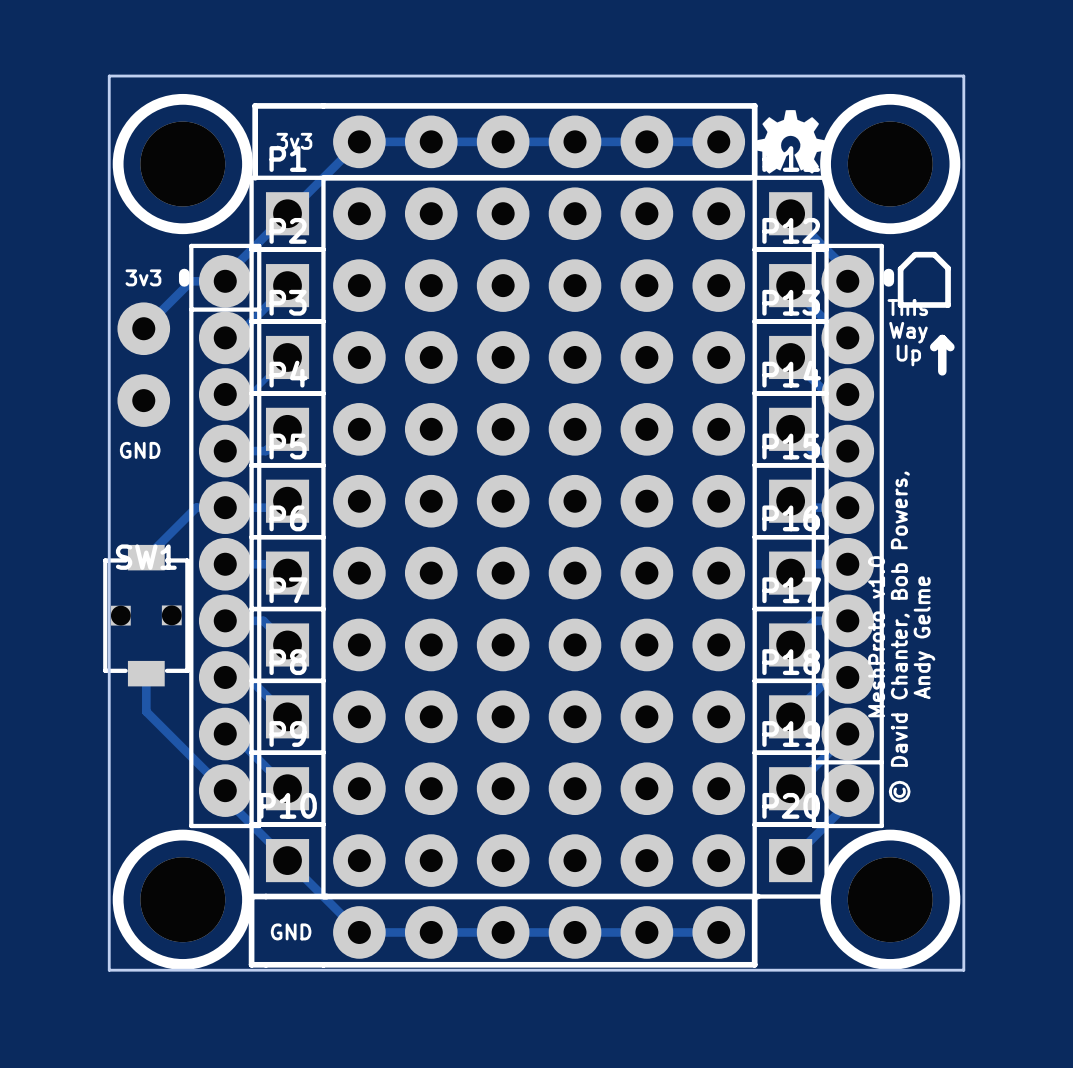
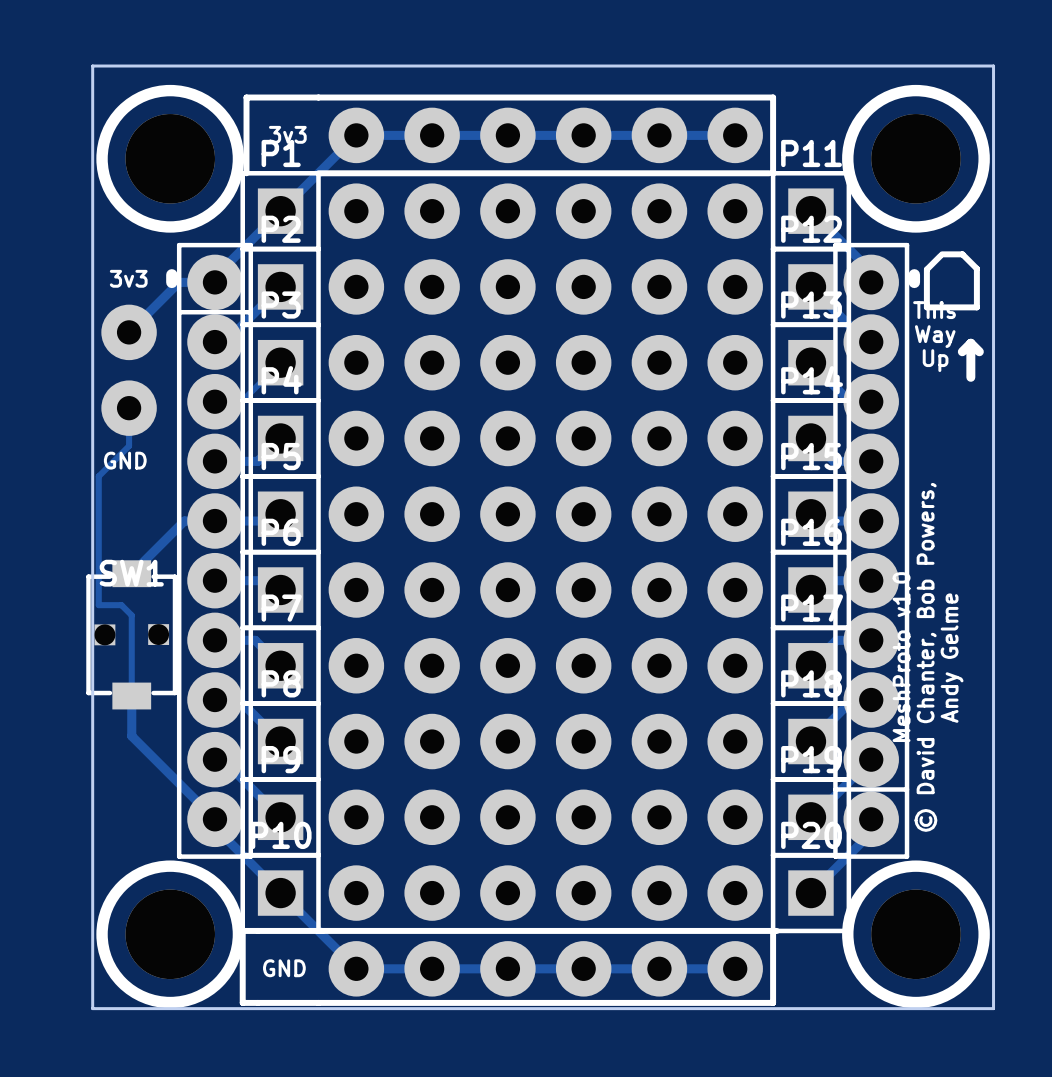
drawing: [755, 110, 827, 174] -> none
track: none -> (129, 408) (129, 446) (98, 476) (98, 605) (121, 605) (131, 615) (131, 696)

